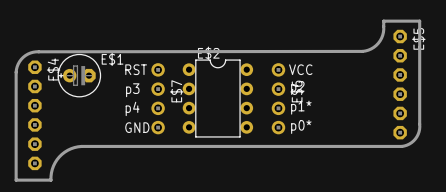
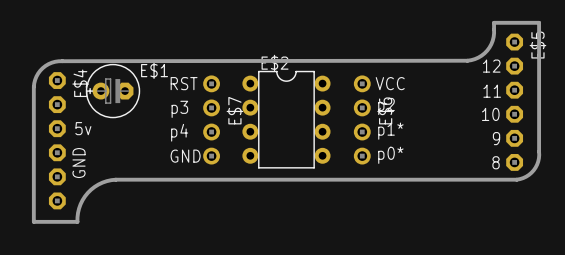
text: none -> 12 (491, 66)
text: none -> 11 (492, 91)
text: none -> 10 (490, 114)
text: none -> 5v (83, 128)
text: none -> 9 (496, 138)
text: none -> 8 (496, 162)
text: none -> GND (79, 163)

